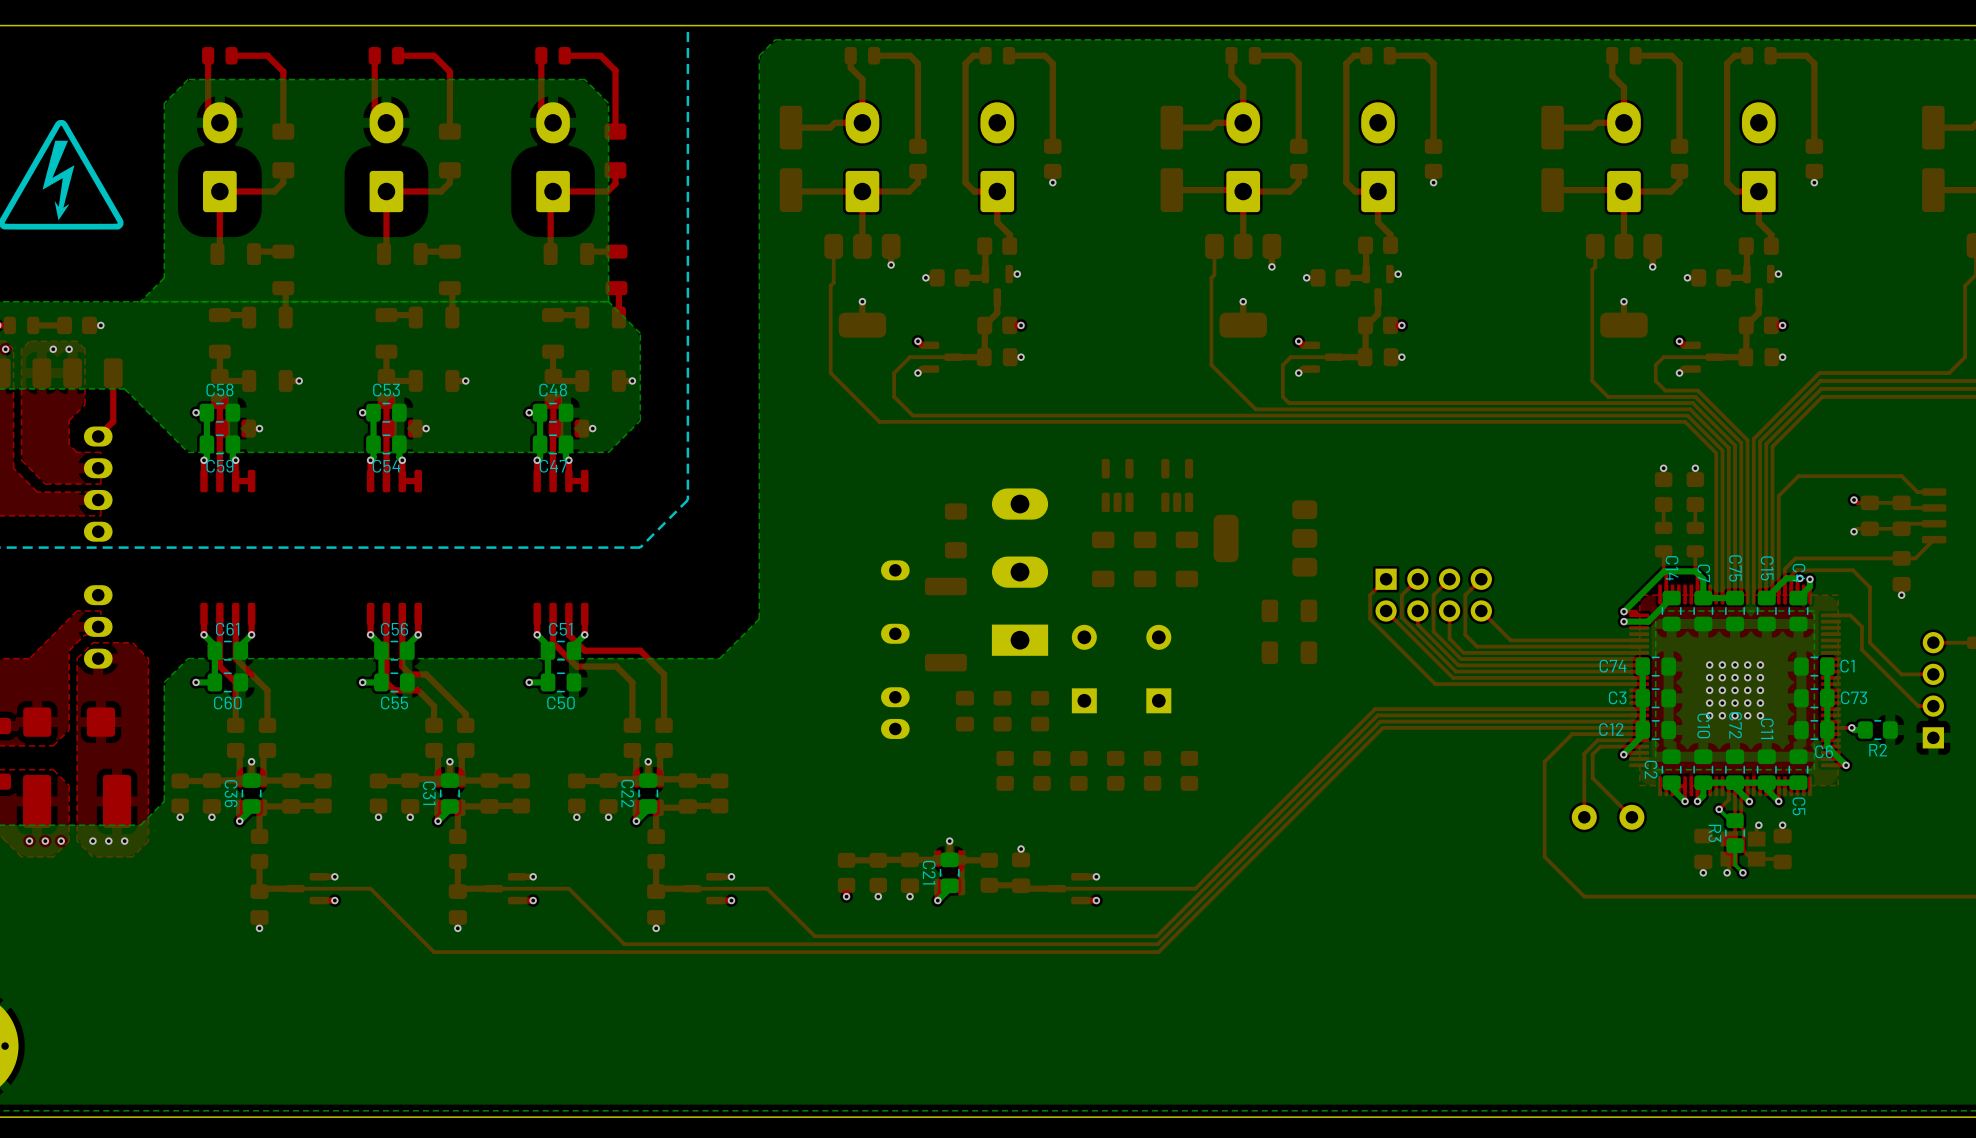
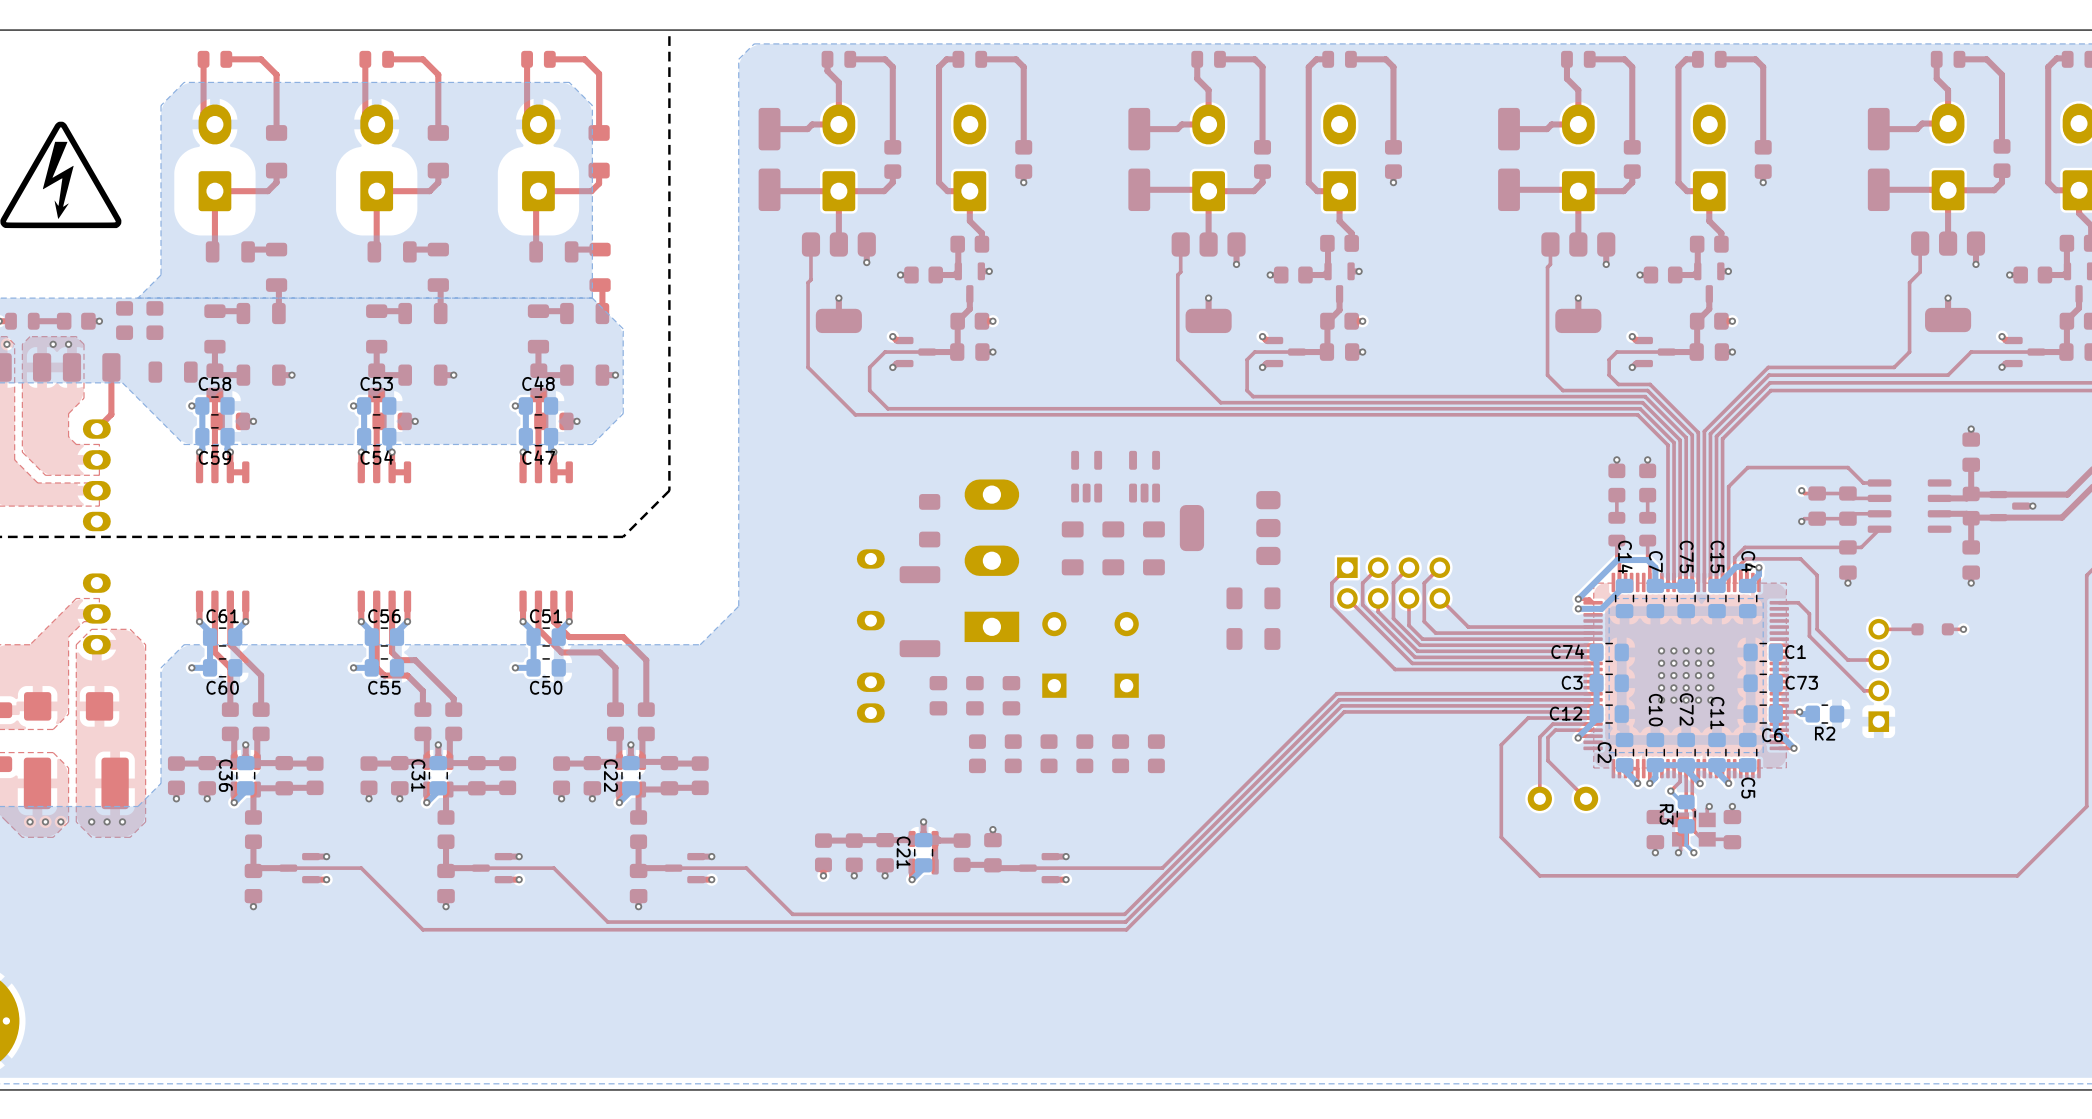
part: none -> (124, 320)
part: none -> (154, 320)
part: none -> (173, 372)

